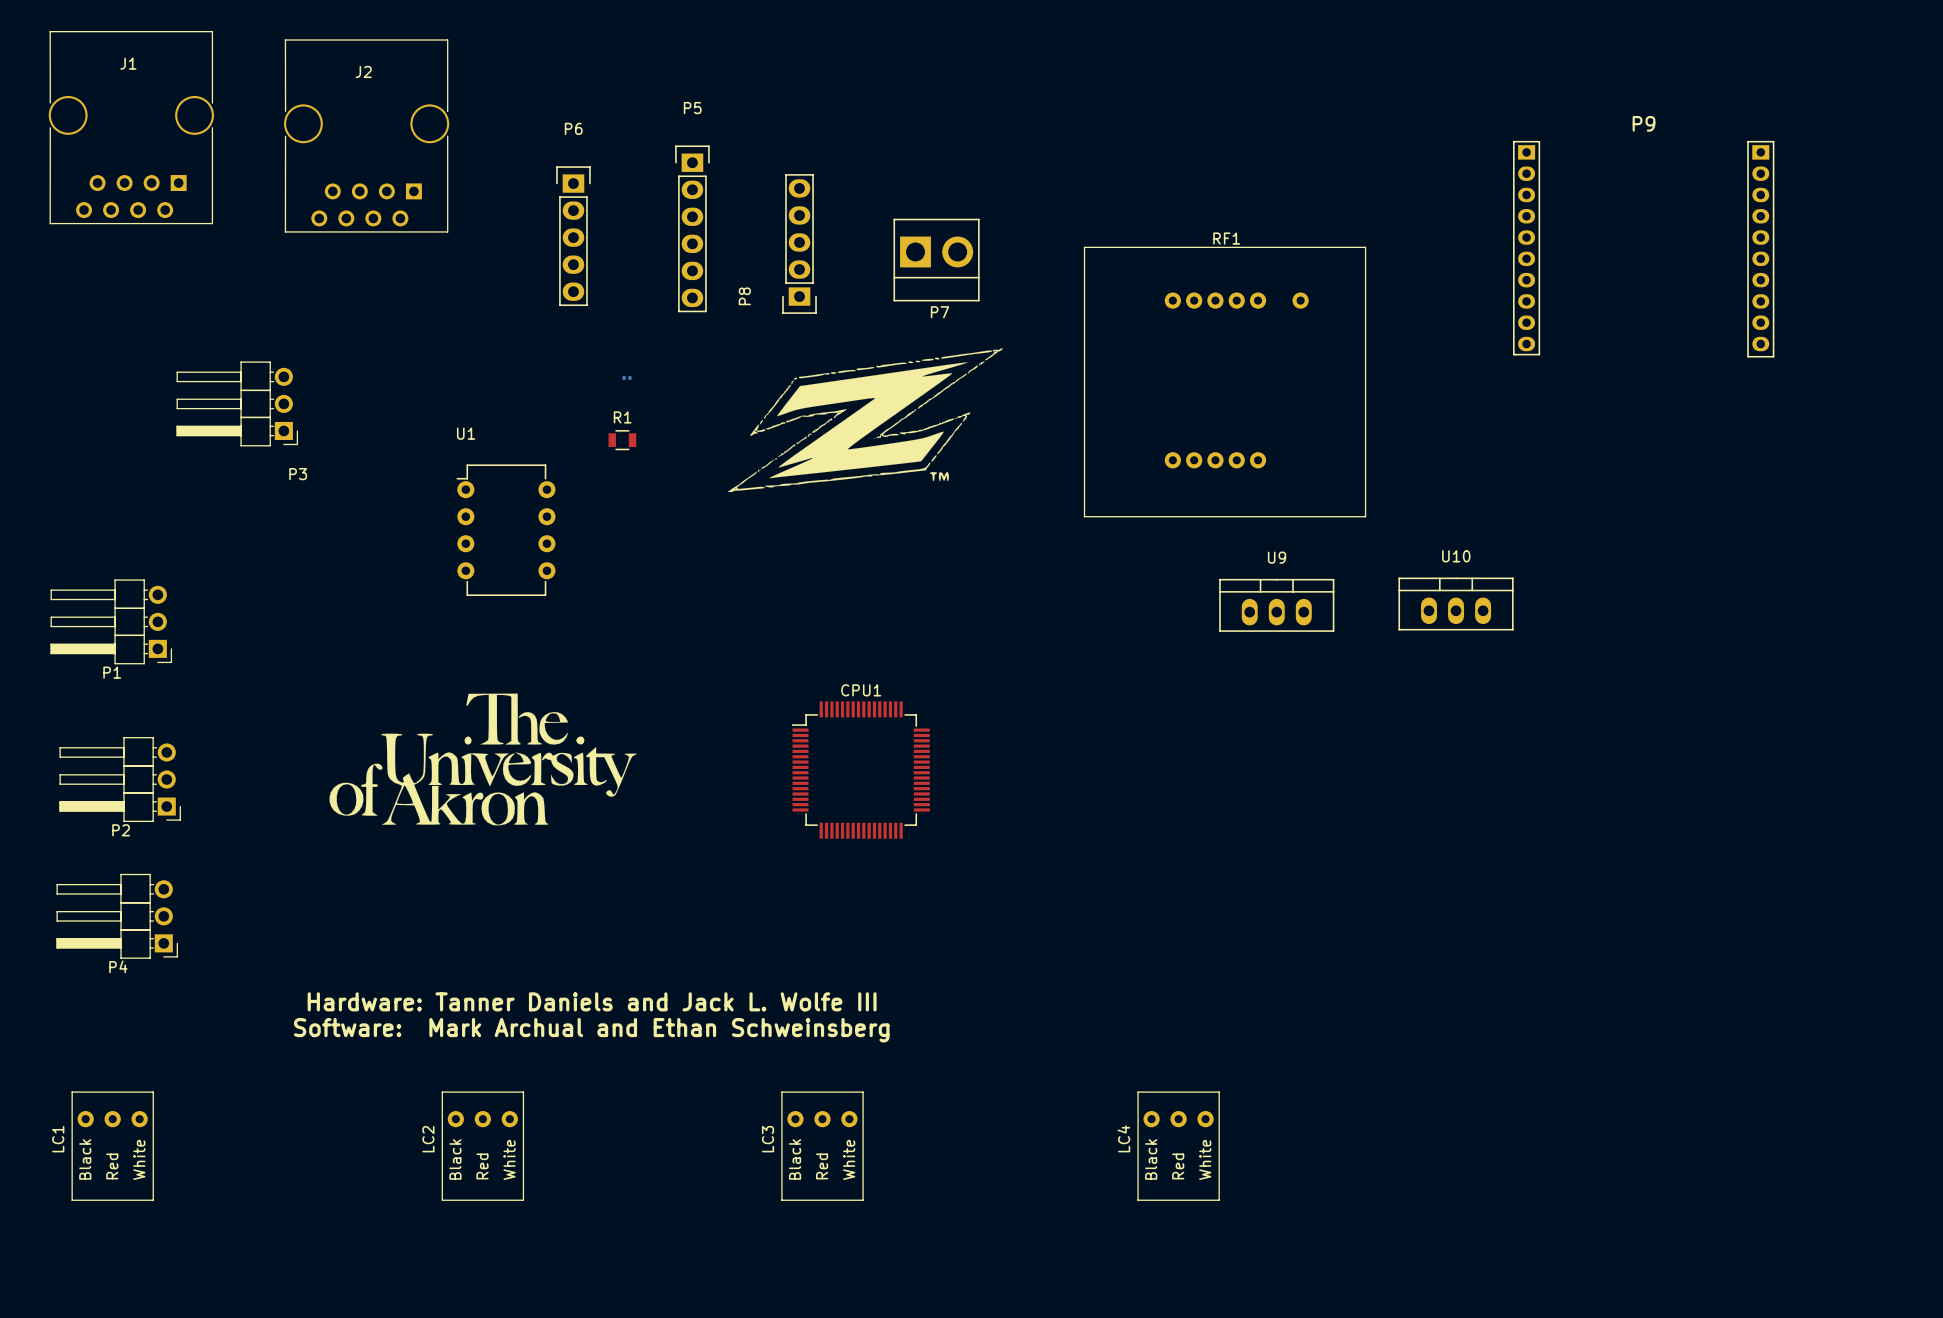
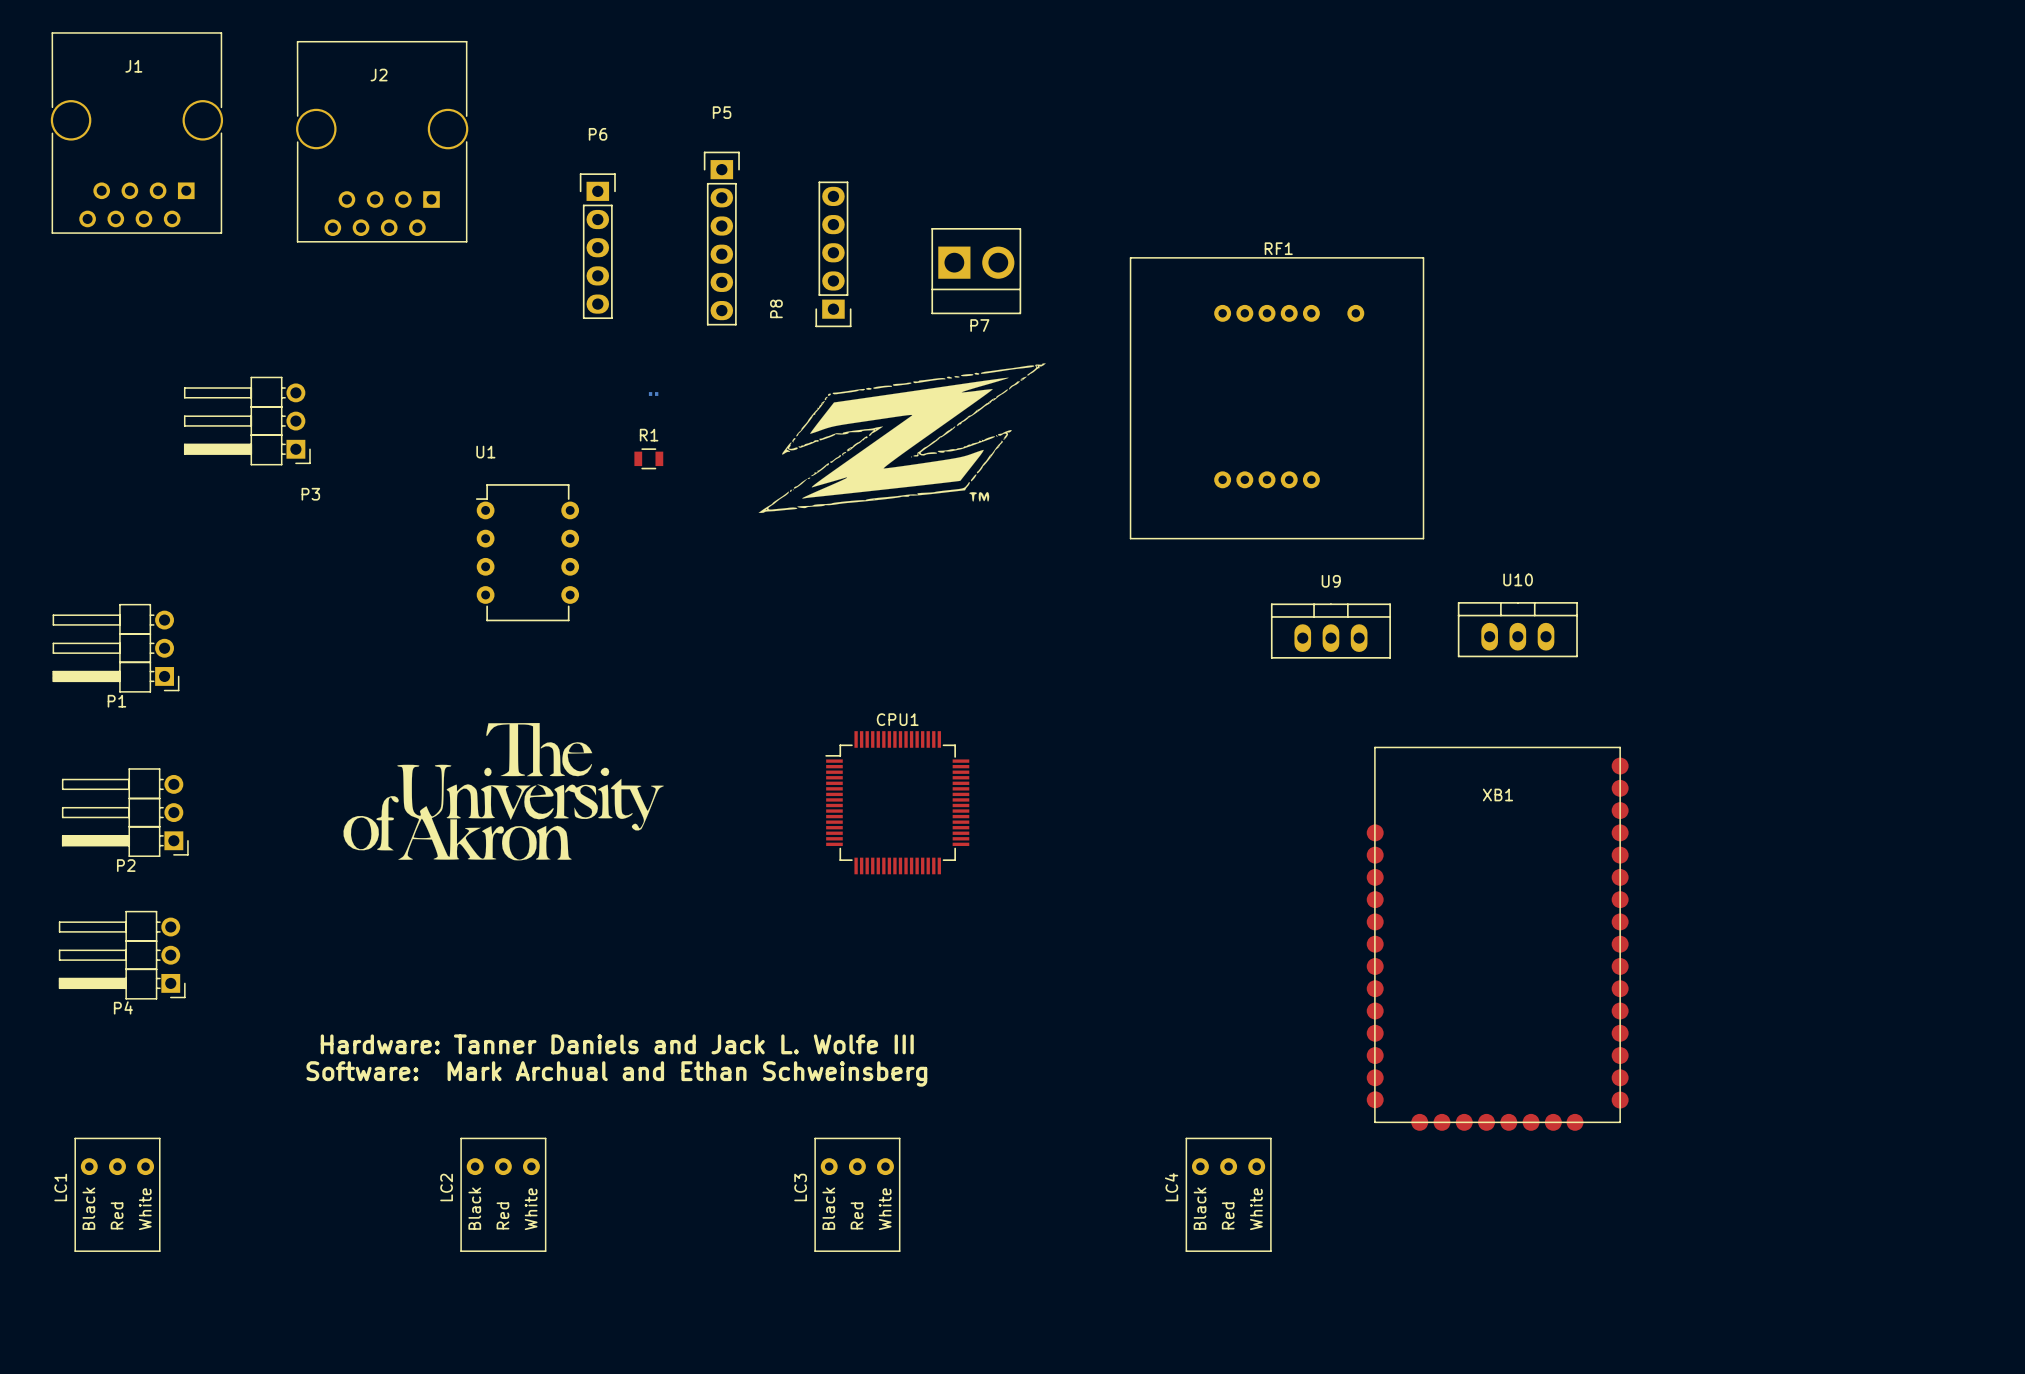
P9: (1643, 249) -> none
XB1: none -> (1497, 939)

